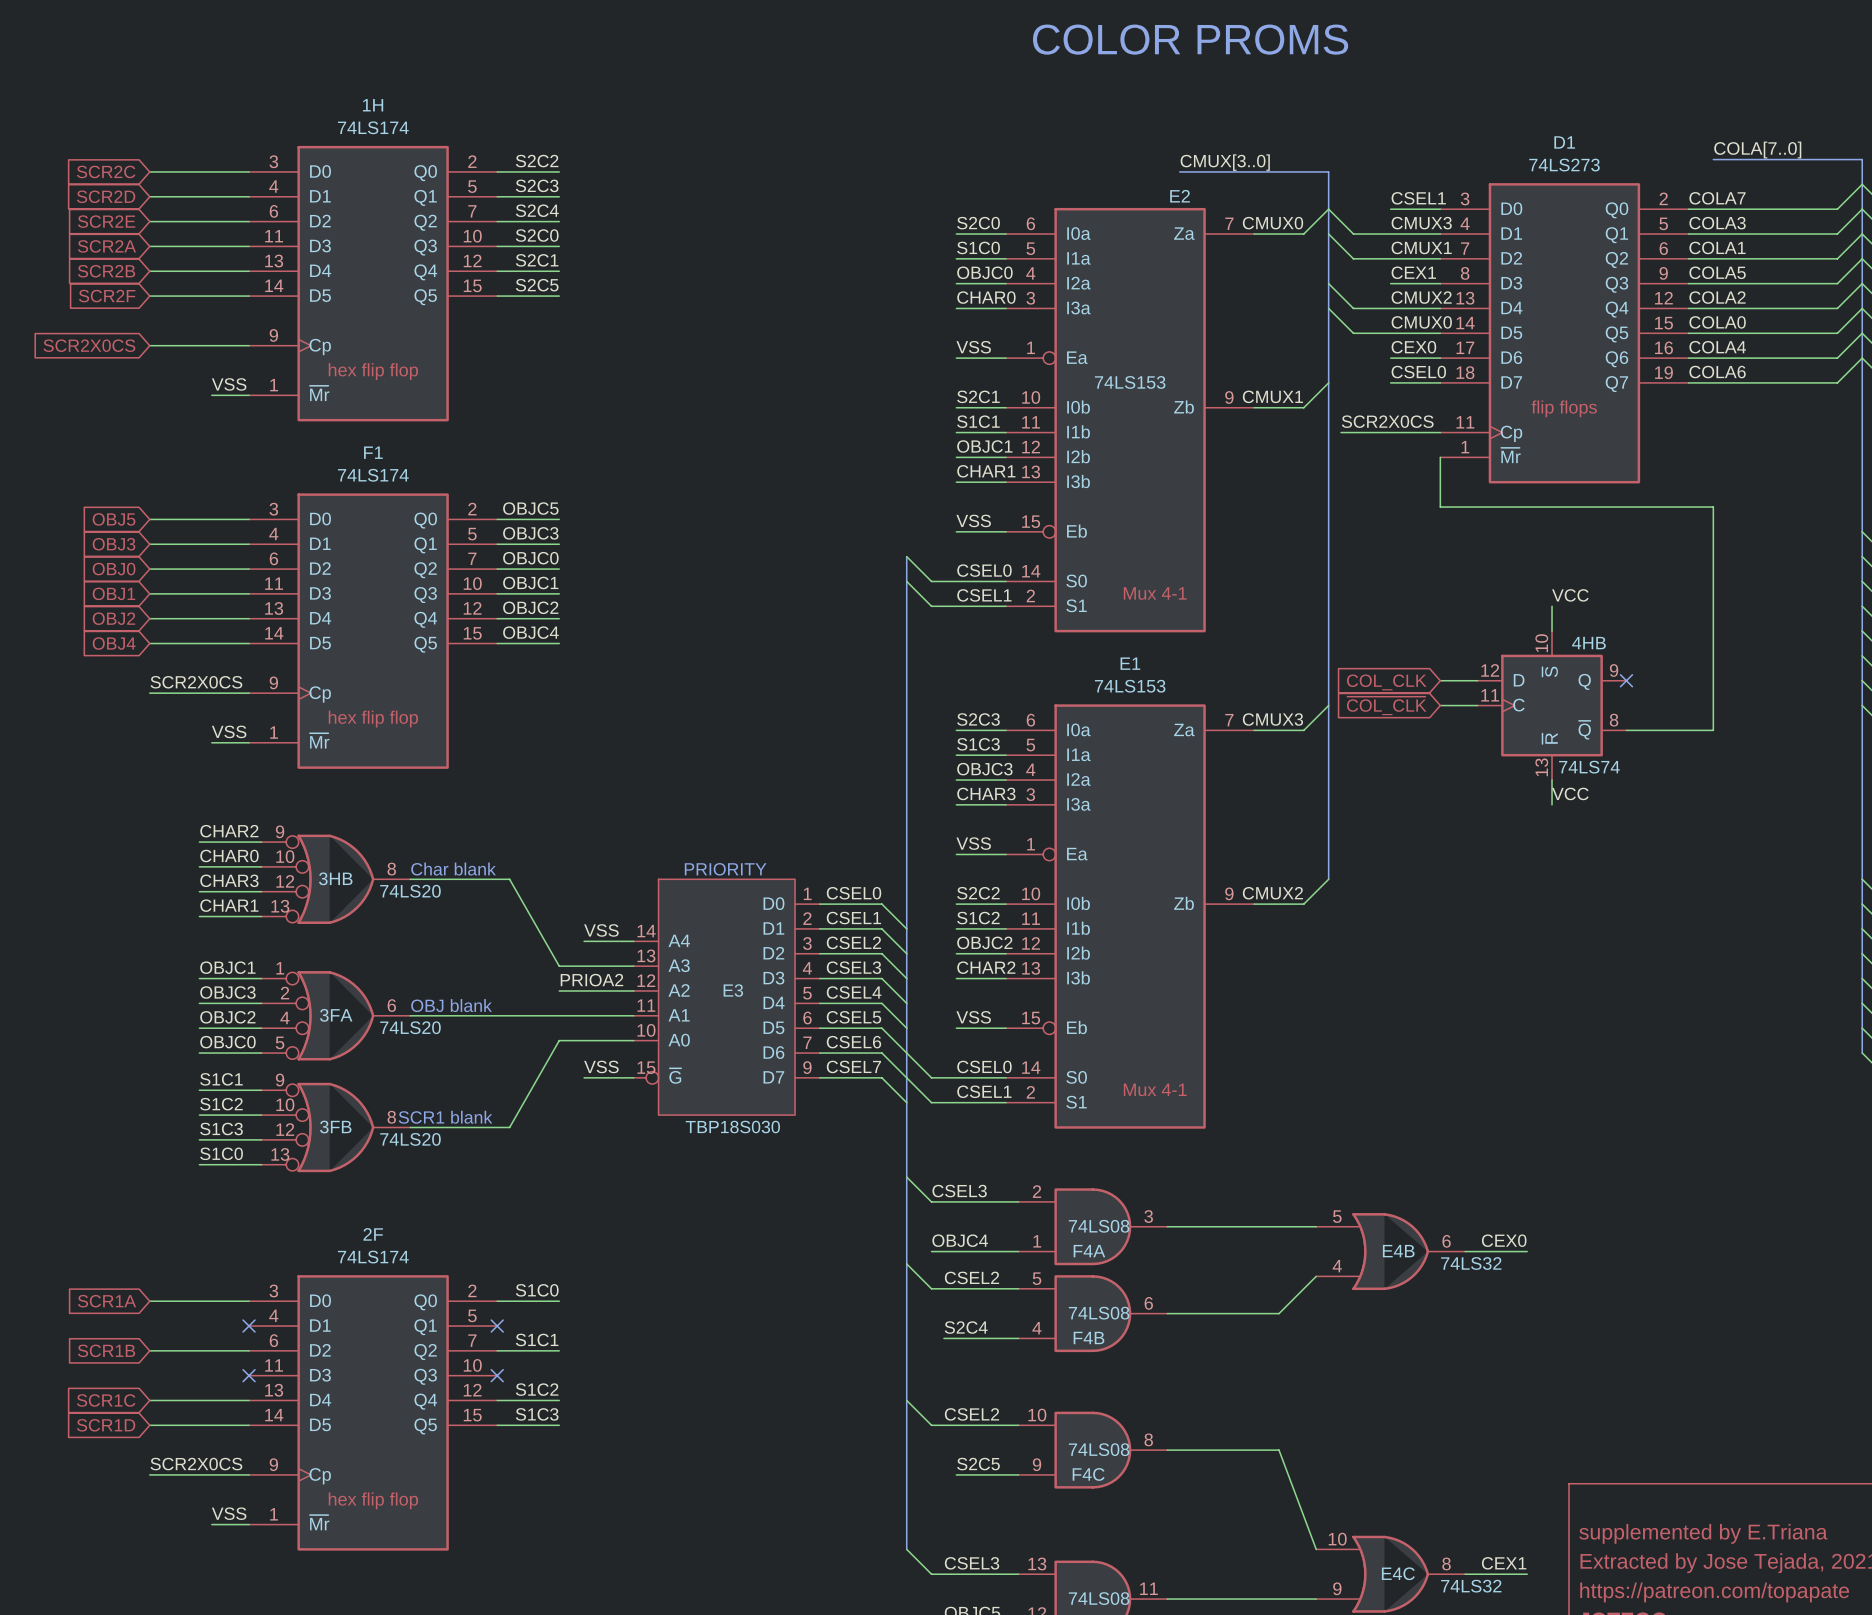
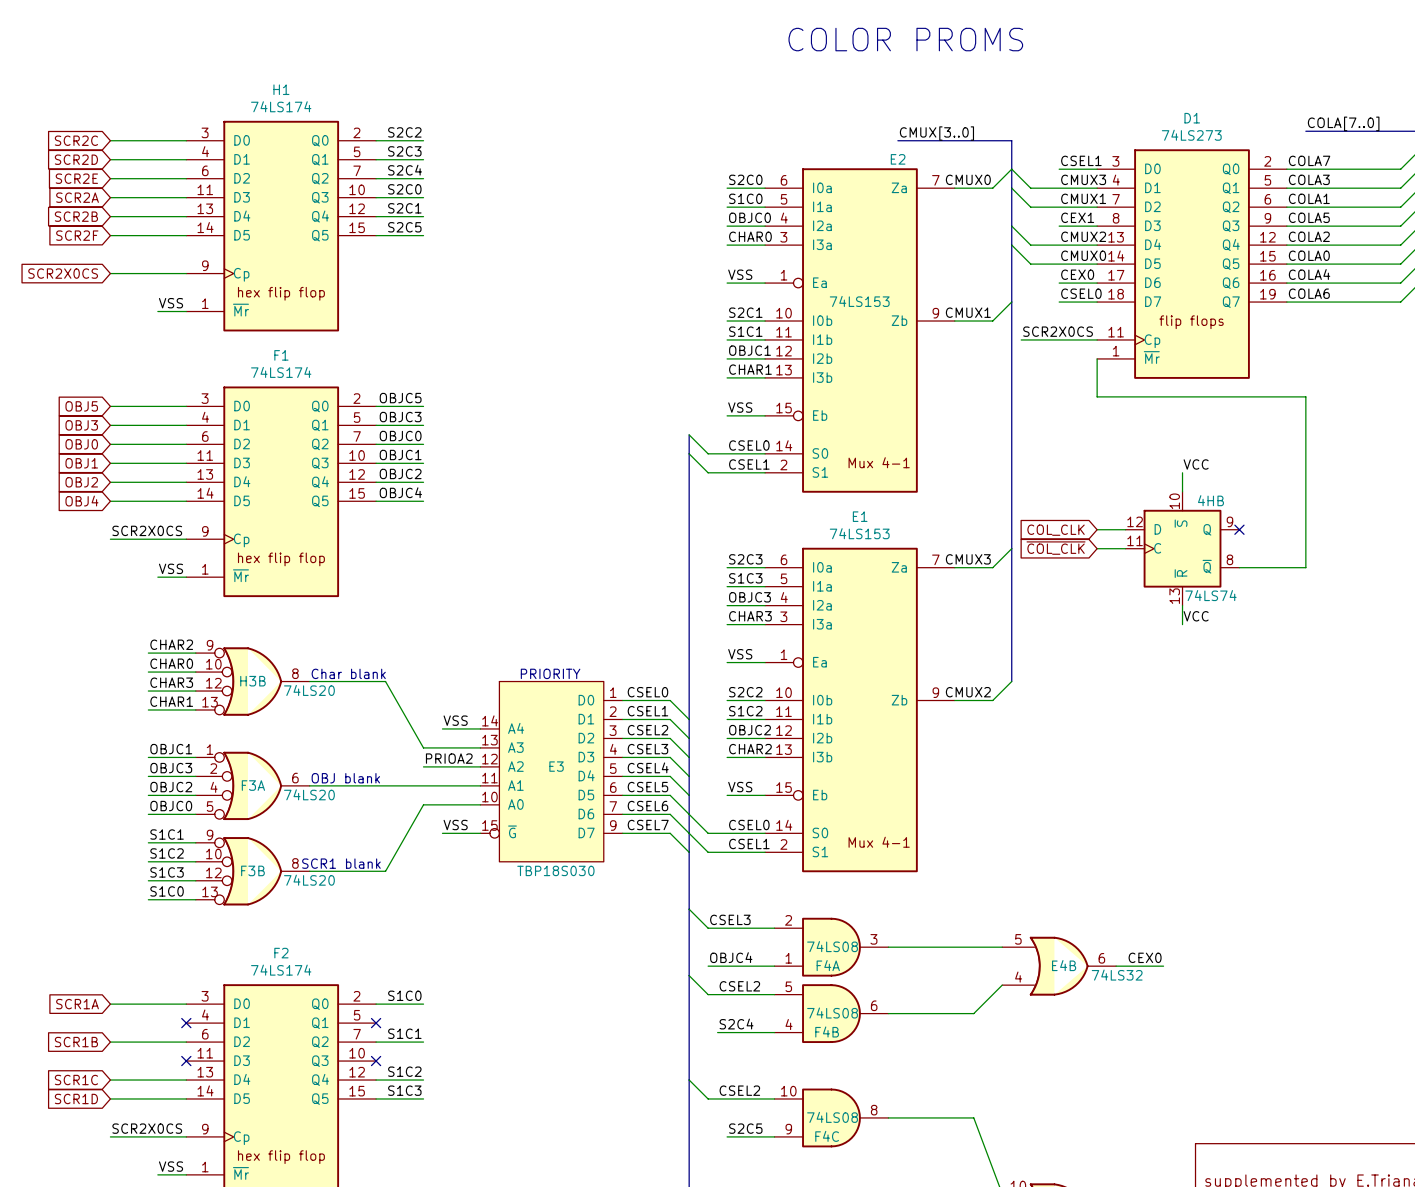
1H name: 1H (373, 105) -> H1 (281, 89)
3HB name: 3HB (335, 878) -> H3B (252, 681)
3FA name: 3FA (336, 1015) -> F3A (253, 785)
3FB name: 3FB (335, 1127) -> F3B (252, 870)
2F name: 2F (373, 1234) -> F2 (281, 953)

